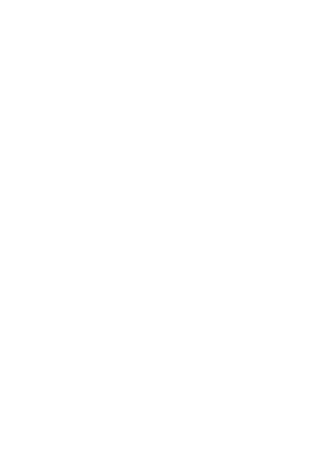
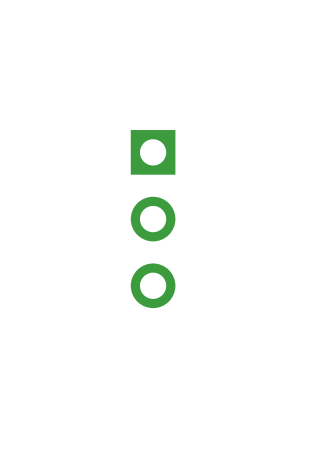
part: none -> (153, 219)

